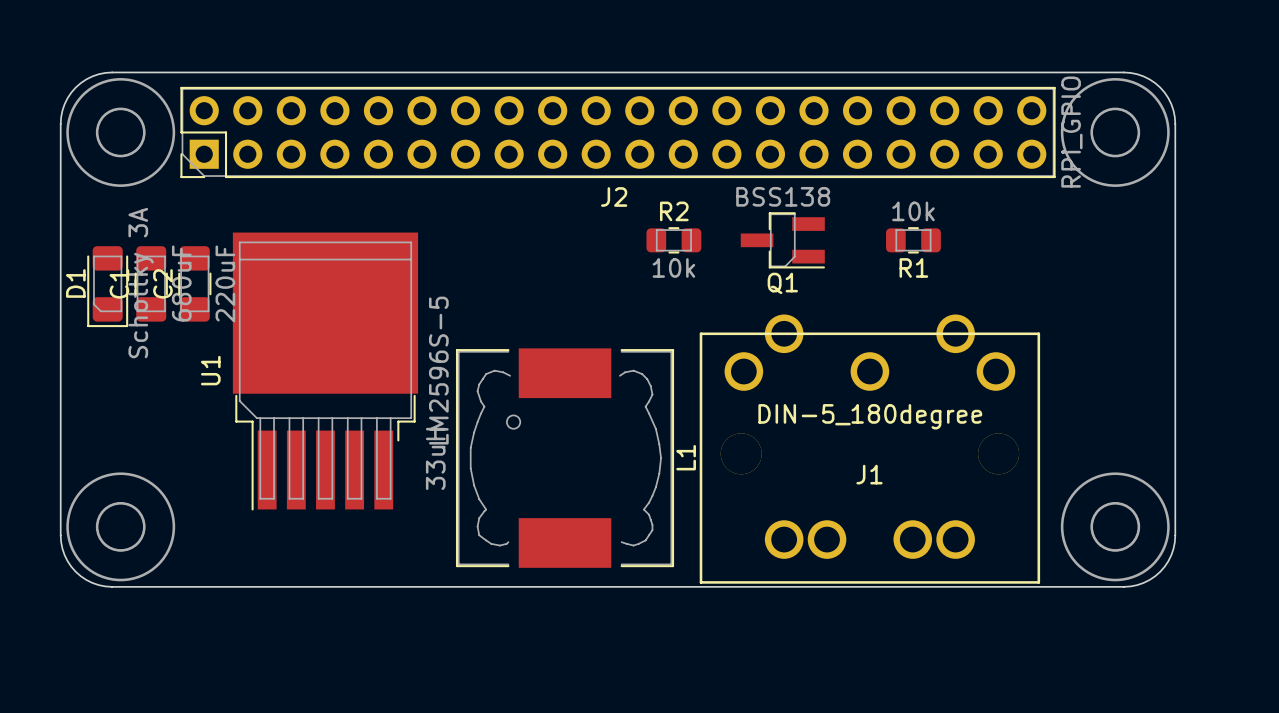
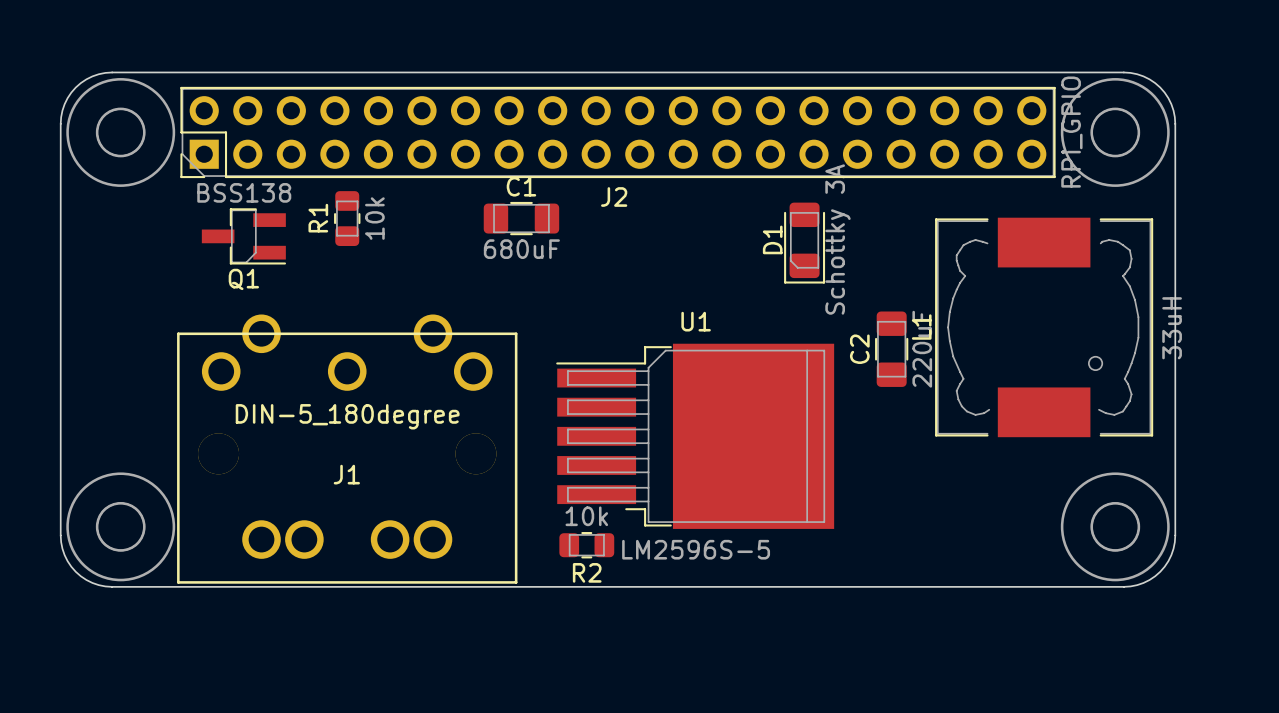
R2 name position: R2 (674, 211) -> R2 (587, 572)
R2 position: (673, 240) -> (586, 545)
Q1 position: (782, 240) -> (243, 236)
R1 rotation: 0° (913, 240) -> 90° clockwise (347, 218)
R1 position: (913, 240) -> (347, 218)
R2 value position: 10k (673, 267) -> 10k (586, 516)
C1 rotation: 0° (151, 283) -> 90° clockwise (521, 218)
C1 position: (151, 283) -> (521, 218)
C2 position: (194, 283) -> (891, 349)
D1 position: (107, 286) -> (804, 243)
U1 rotation: 0° (325, 371) -> 90° clockwise (695, 436)
U1 position: (325, 371) -> (695, 436)
J1 position: (869, 449) -> (347, 449)
L1 rotation: 0° (565, 458) -> 180° (1044, 327)
L1 position: (565, 458) -> (1044, 327)

